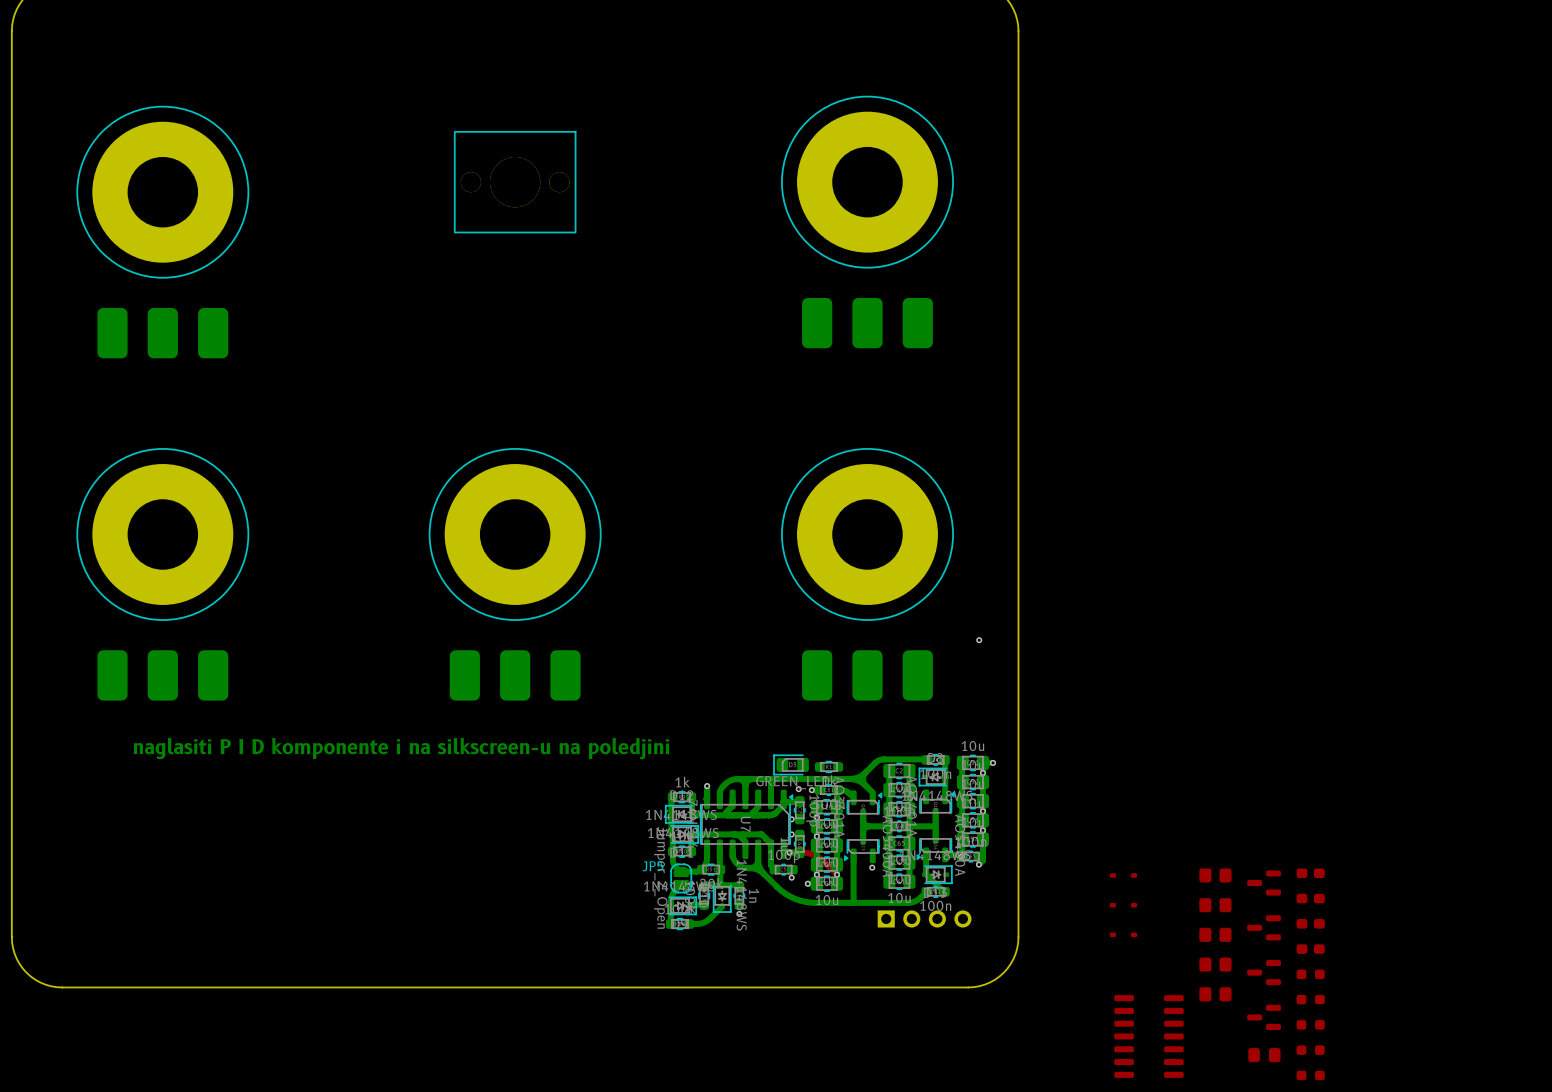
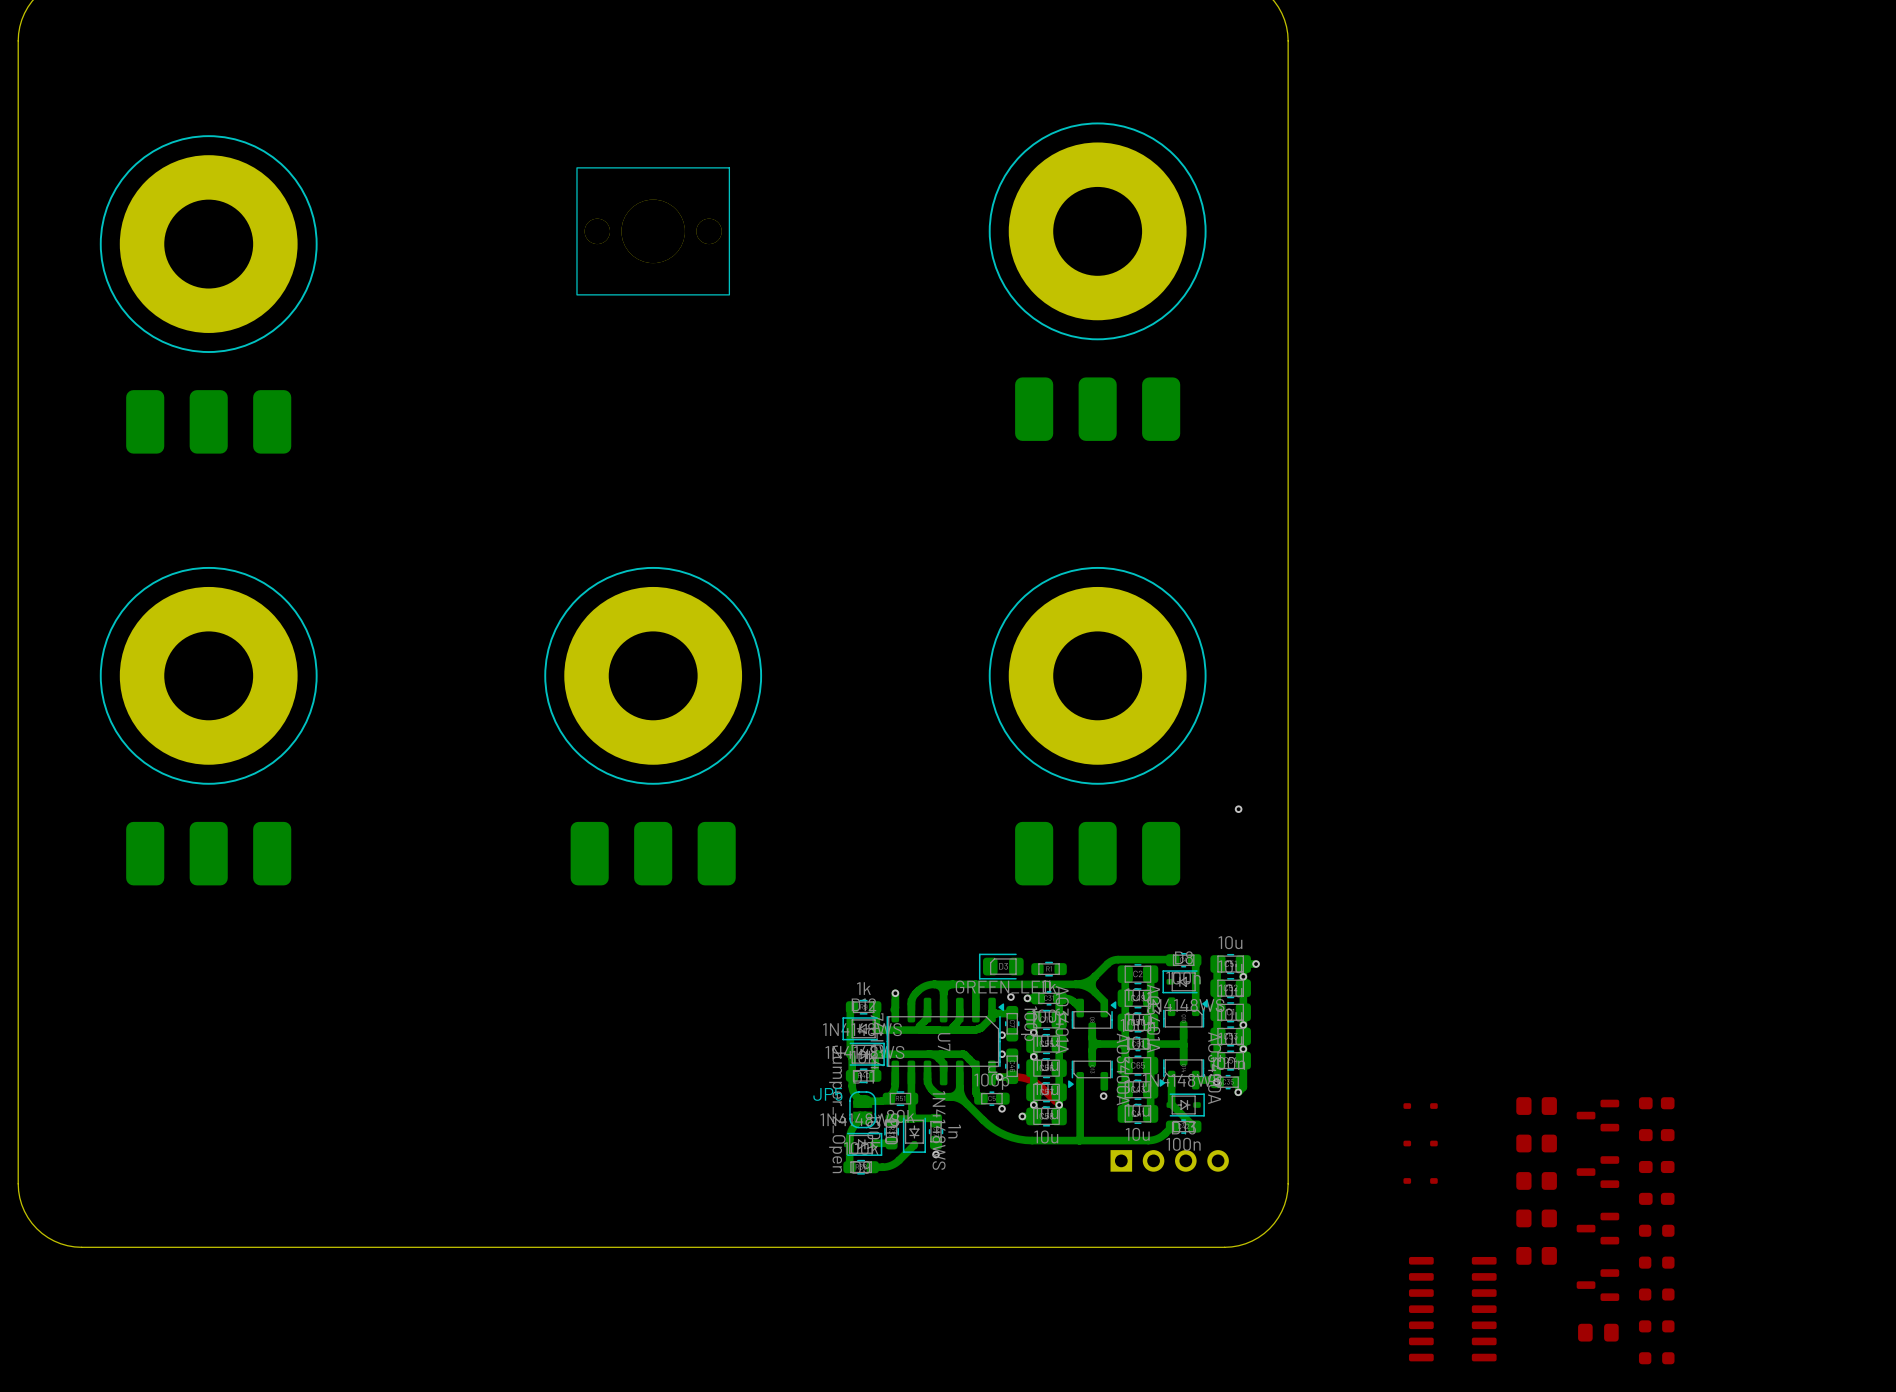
text: naglasiti P I D komponente i na silkscreen-u na poledjini (401, 748) -> none

